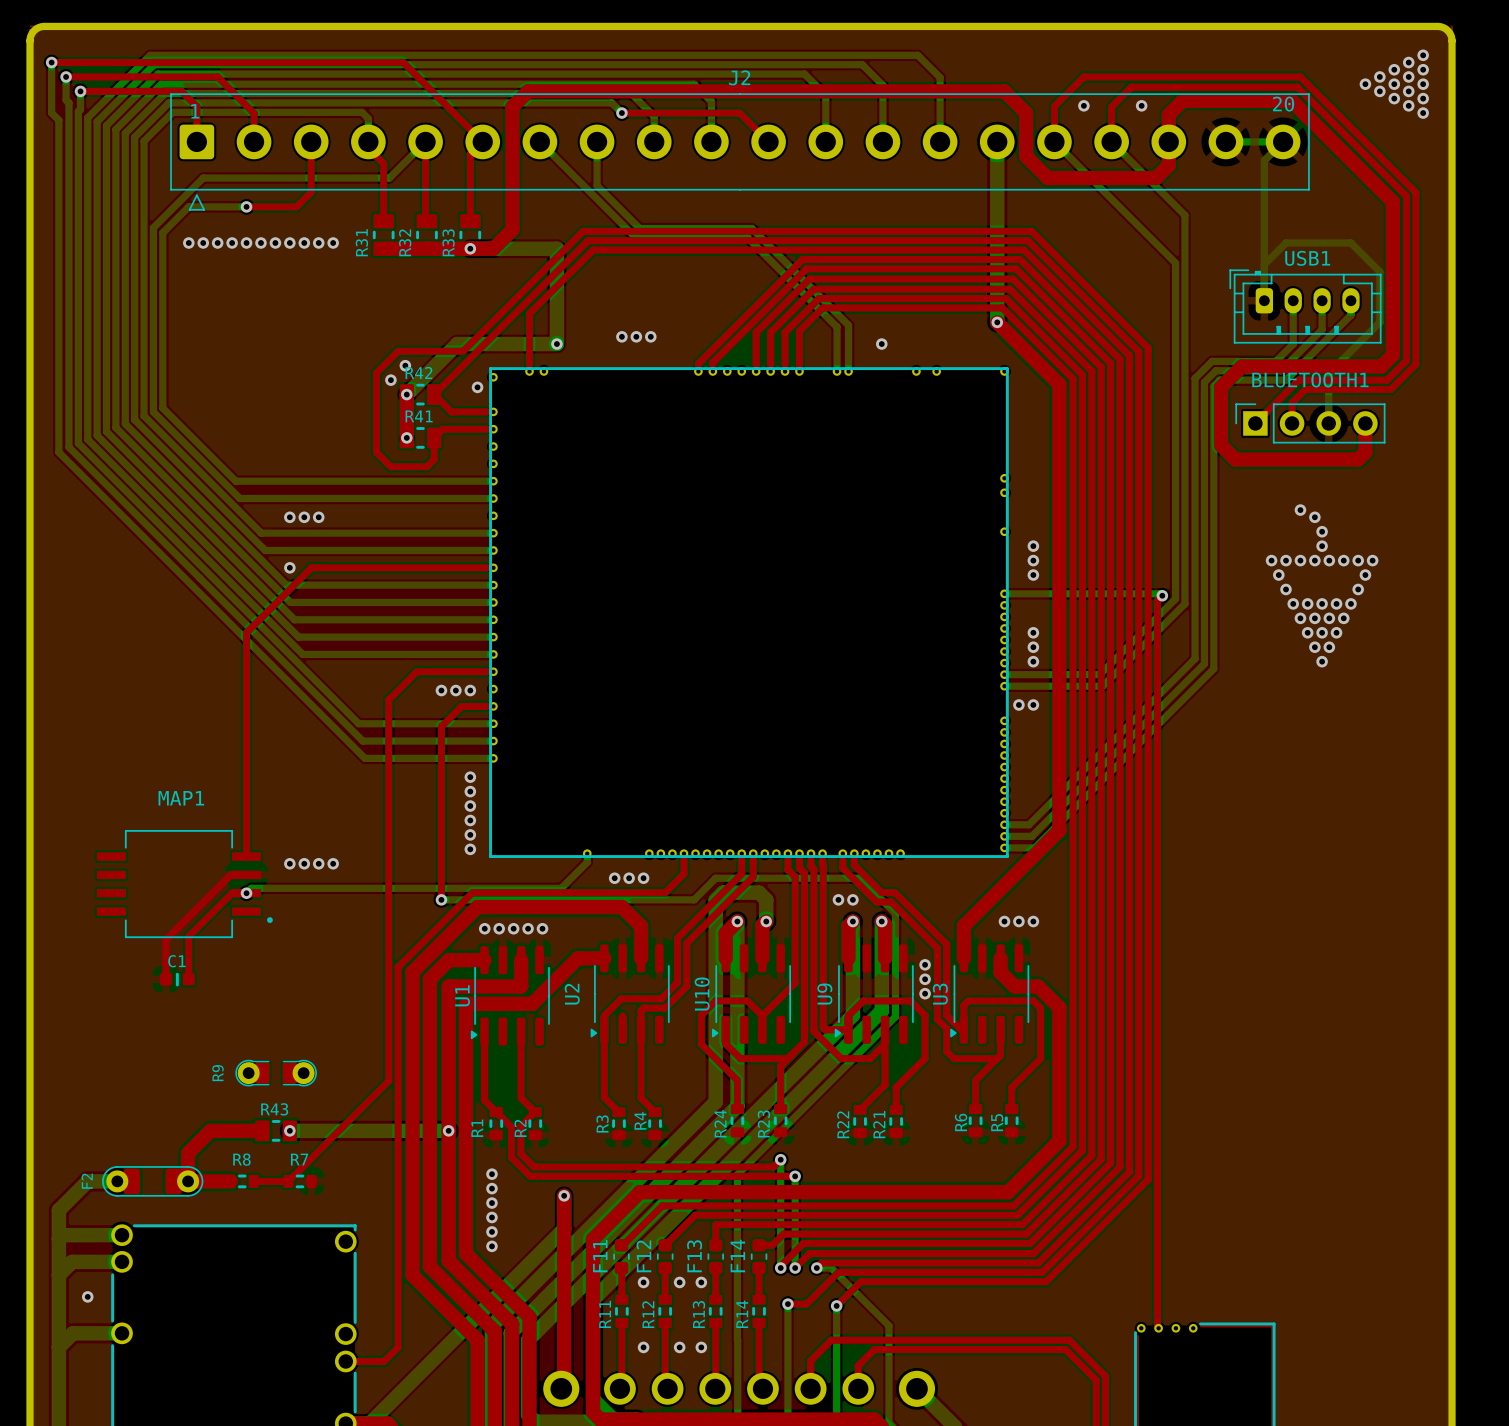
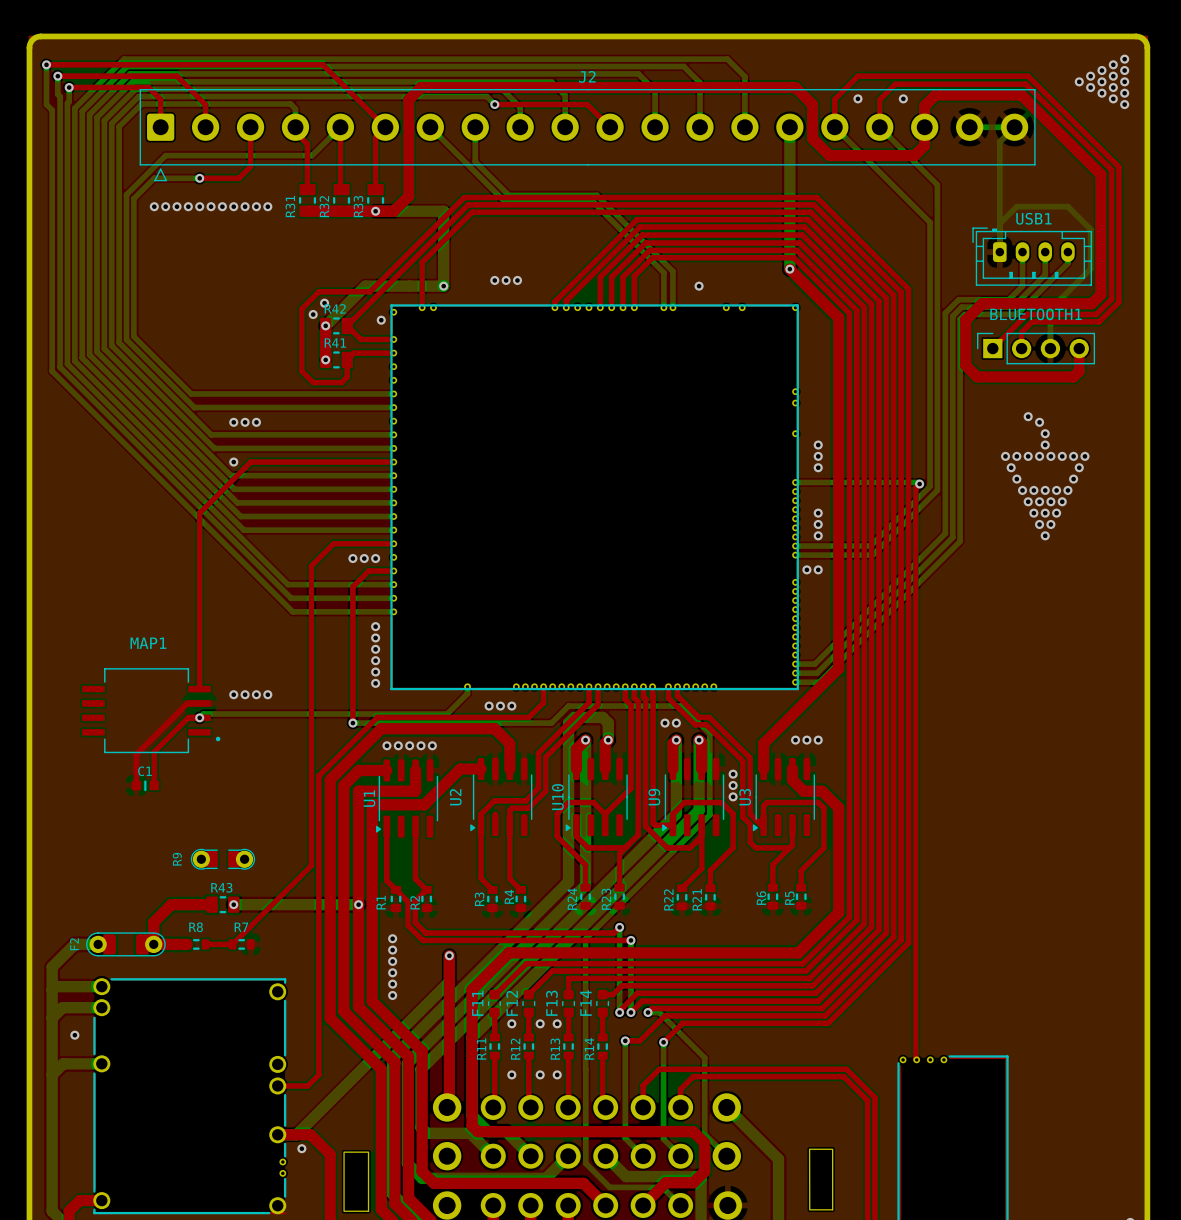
text: 20 (1283, 104) -> none
text: 1 (195, 111) -> none

